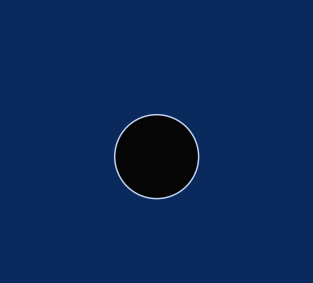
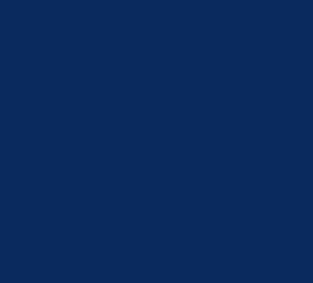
hole: (156, 156) -> none

